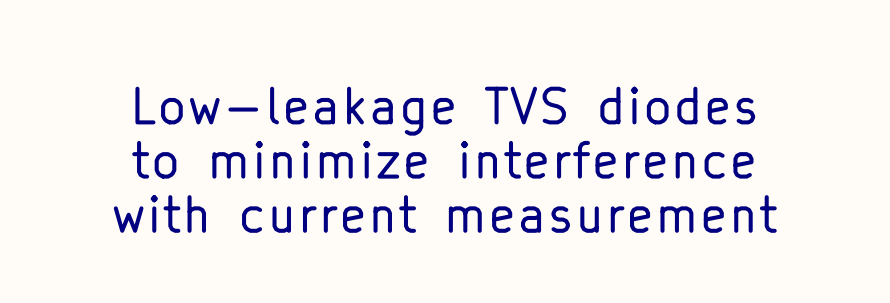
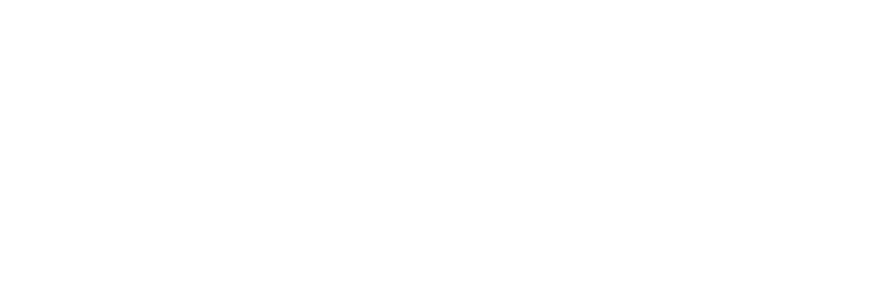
text: Low-leakage TVS diodes (445, 111) -> none
text: to minimize interference (442, 159) -> none
text: with current measurement (445, 213) -> none

